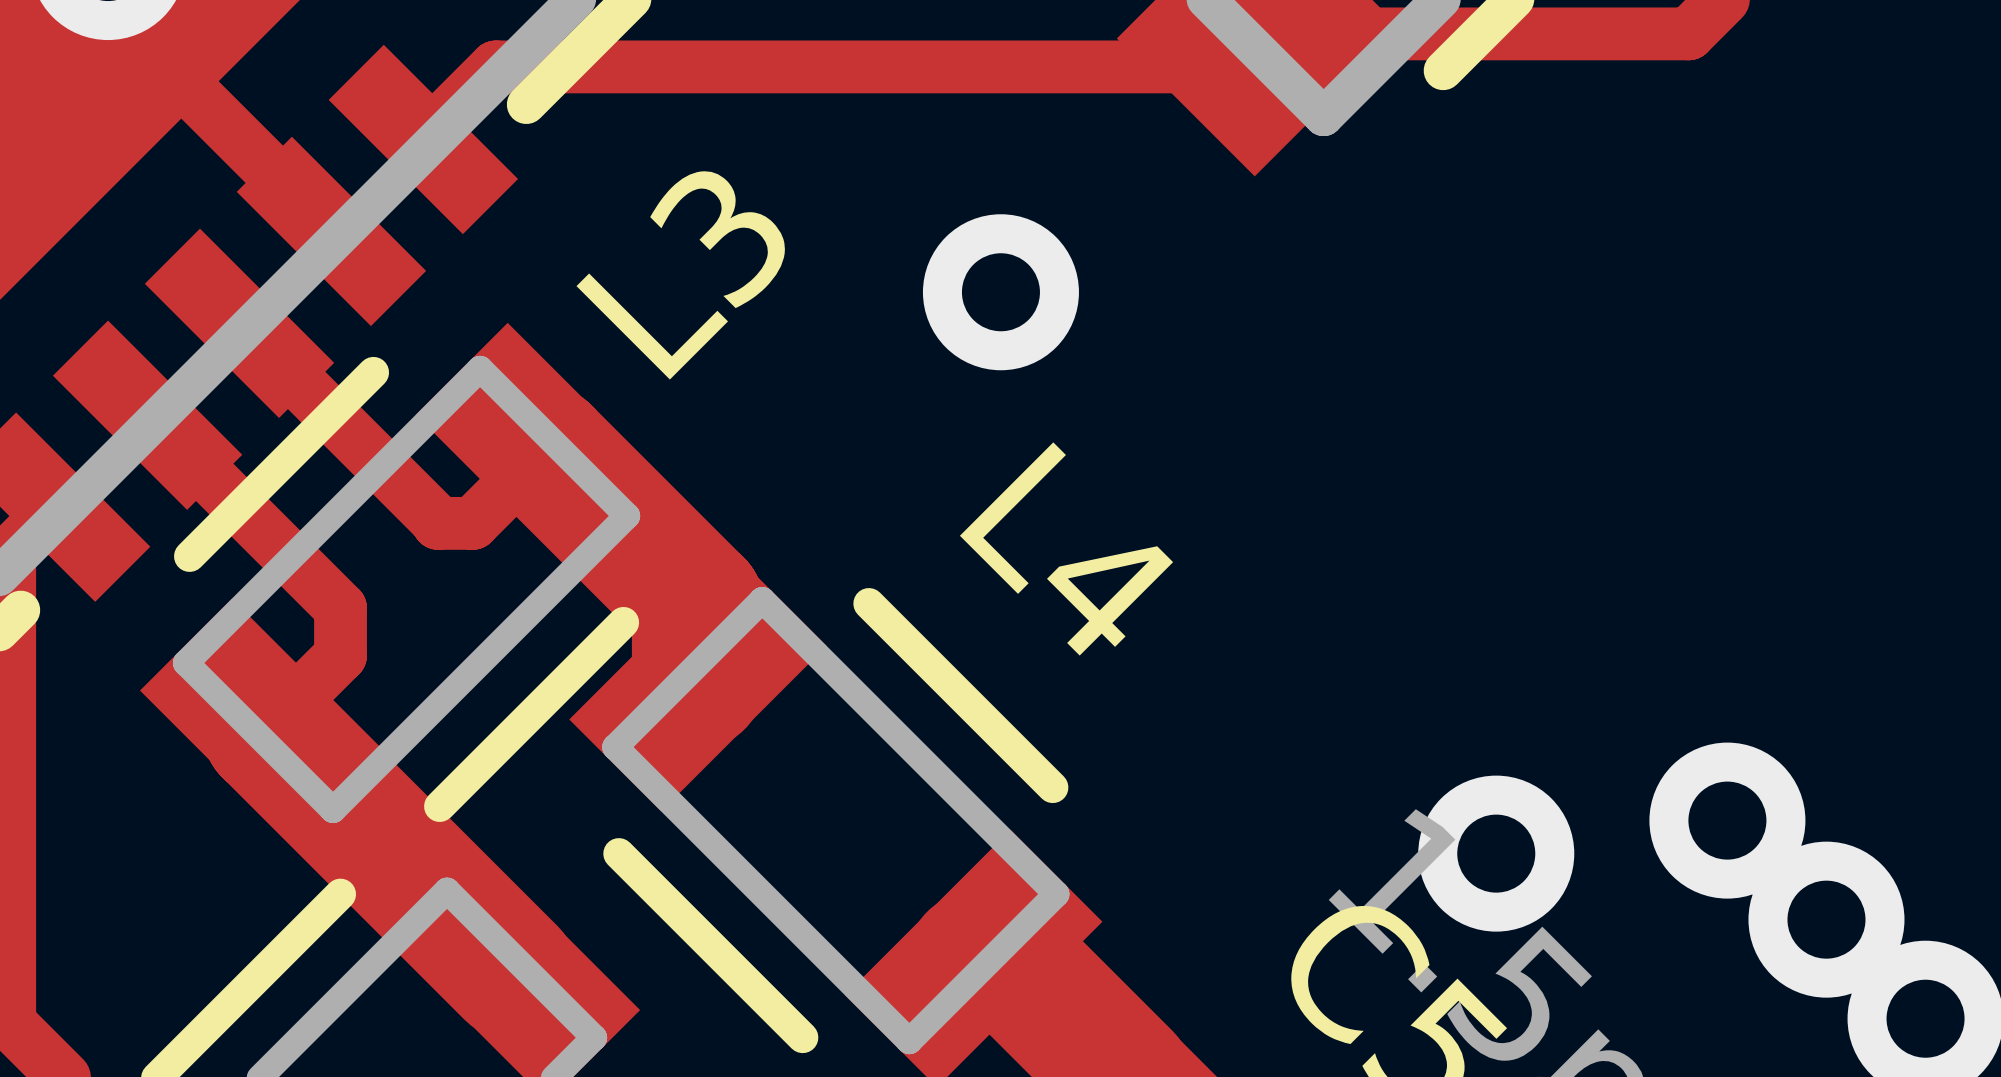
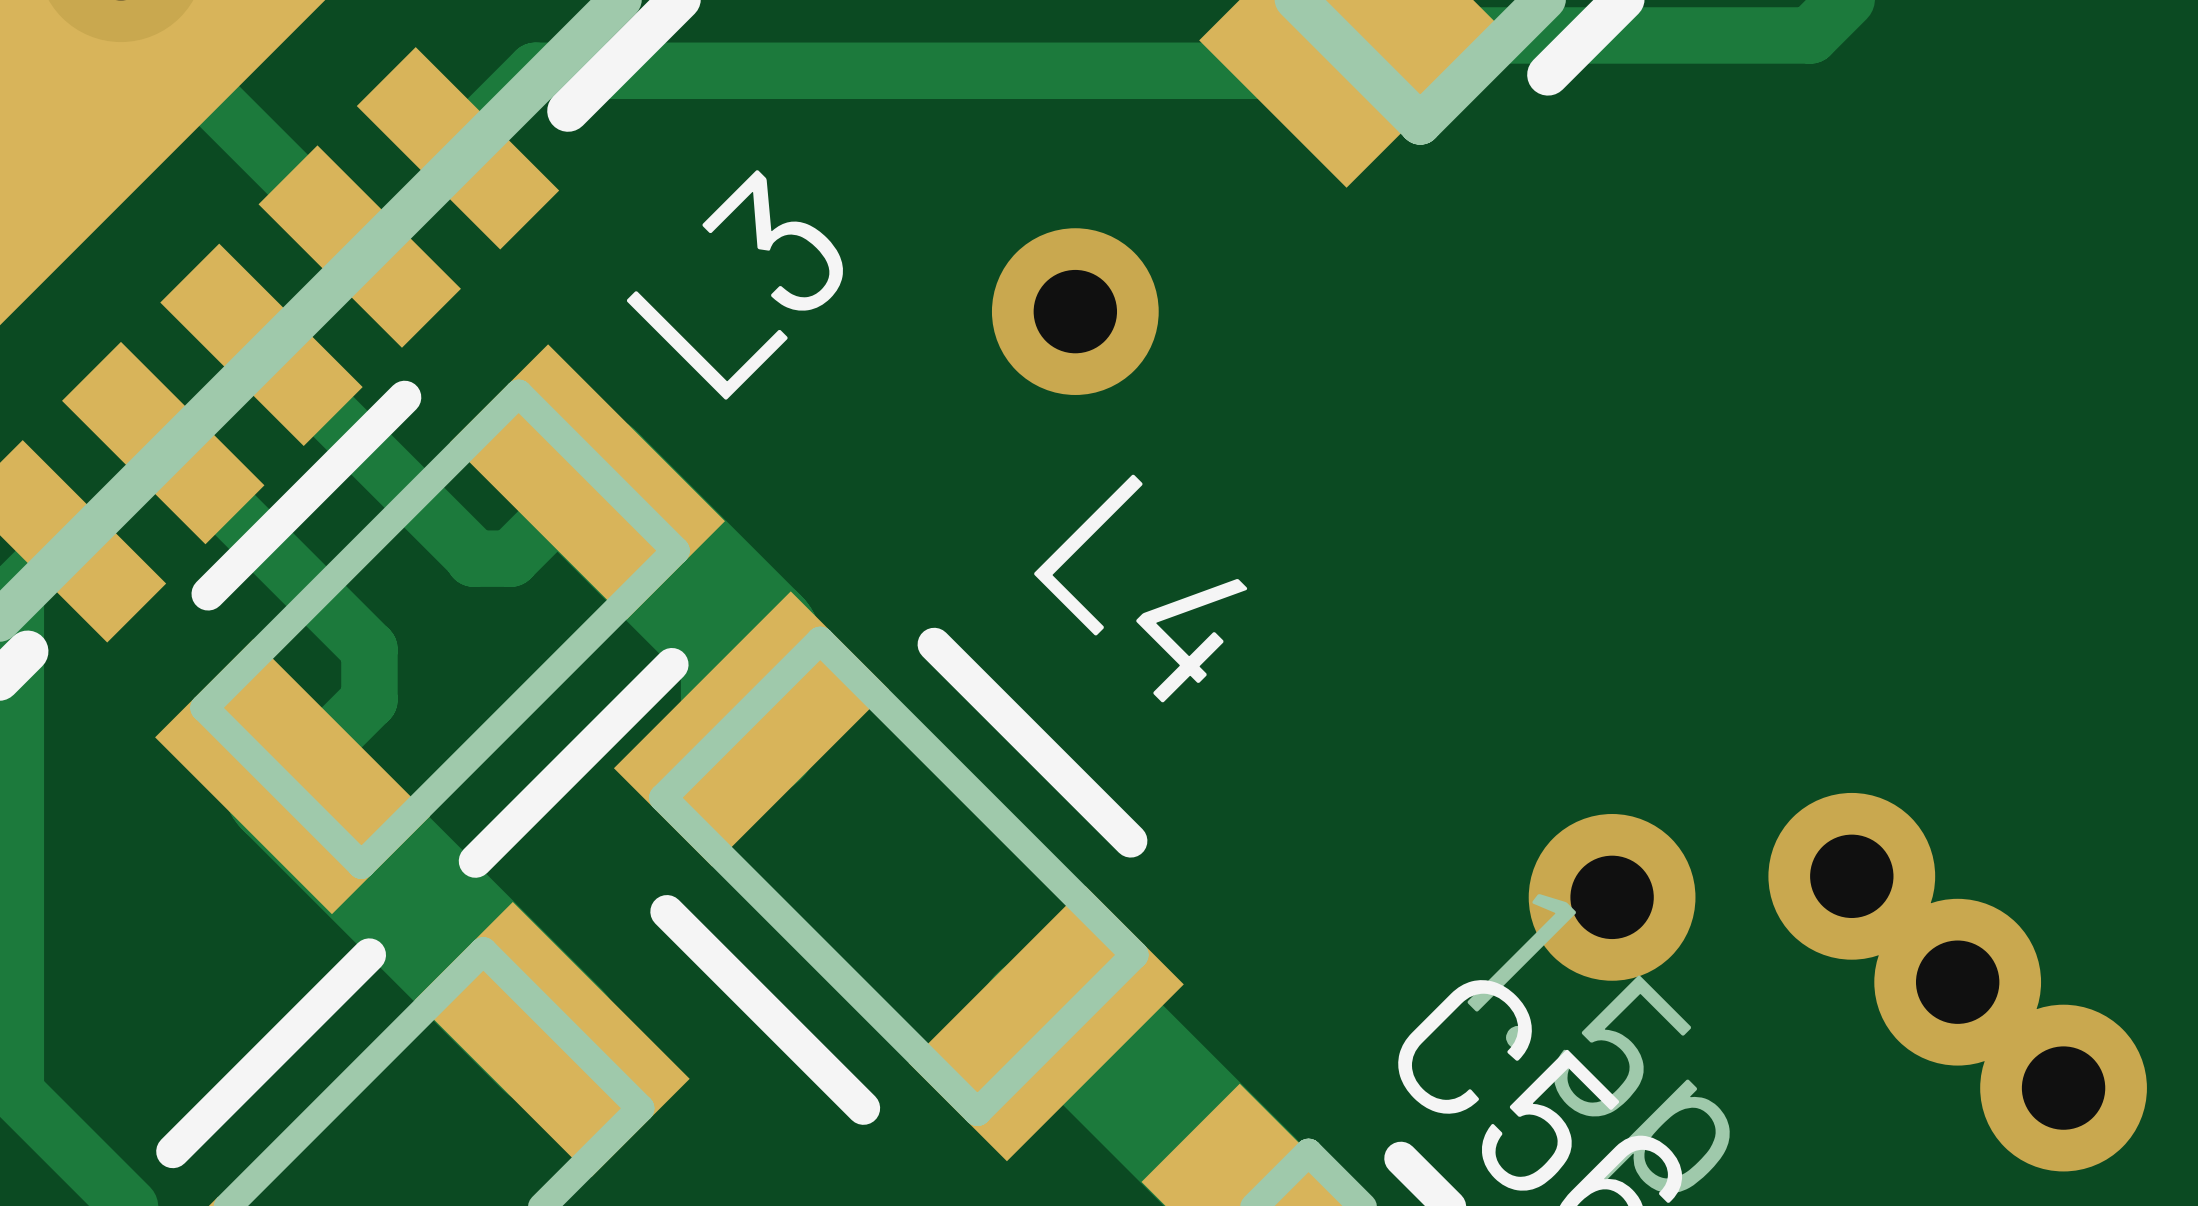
via position: (1496, 853) -> (1612, 897)

